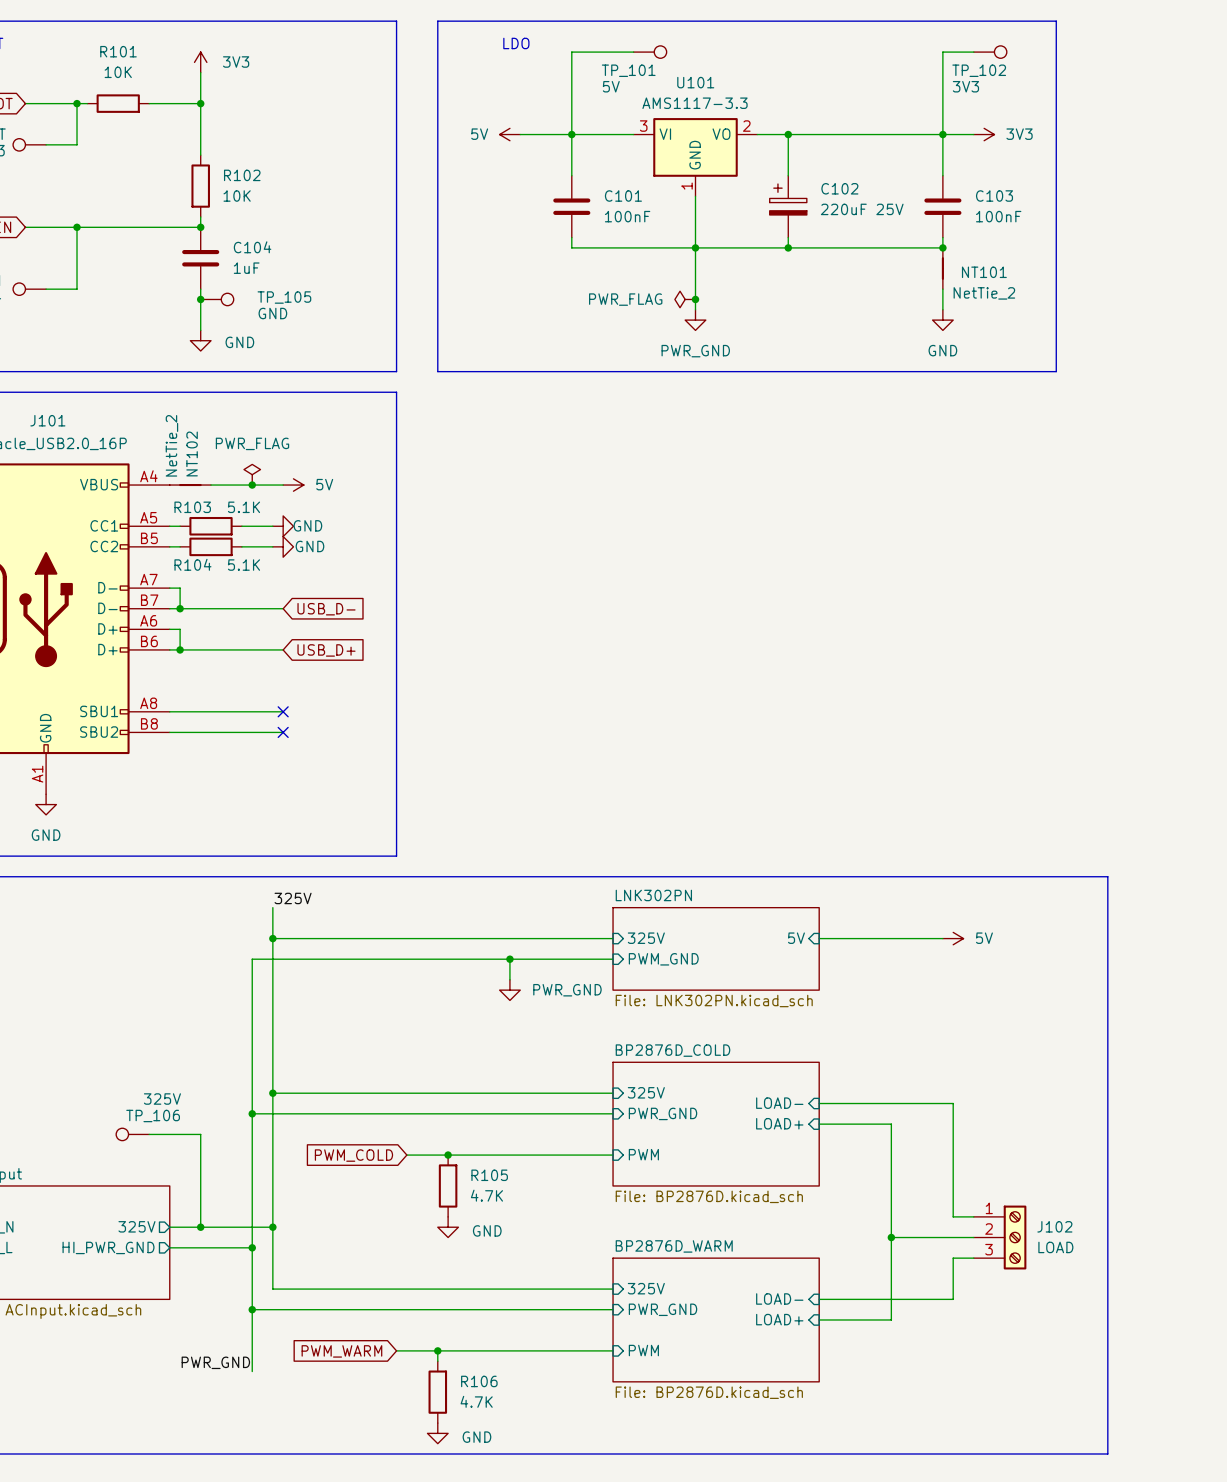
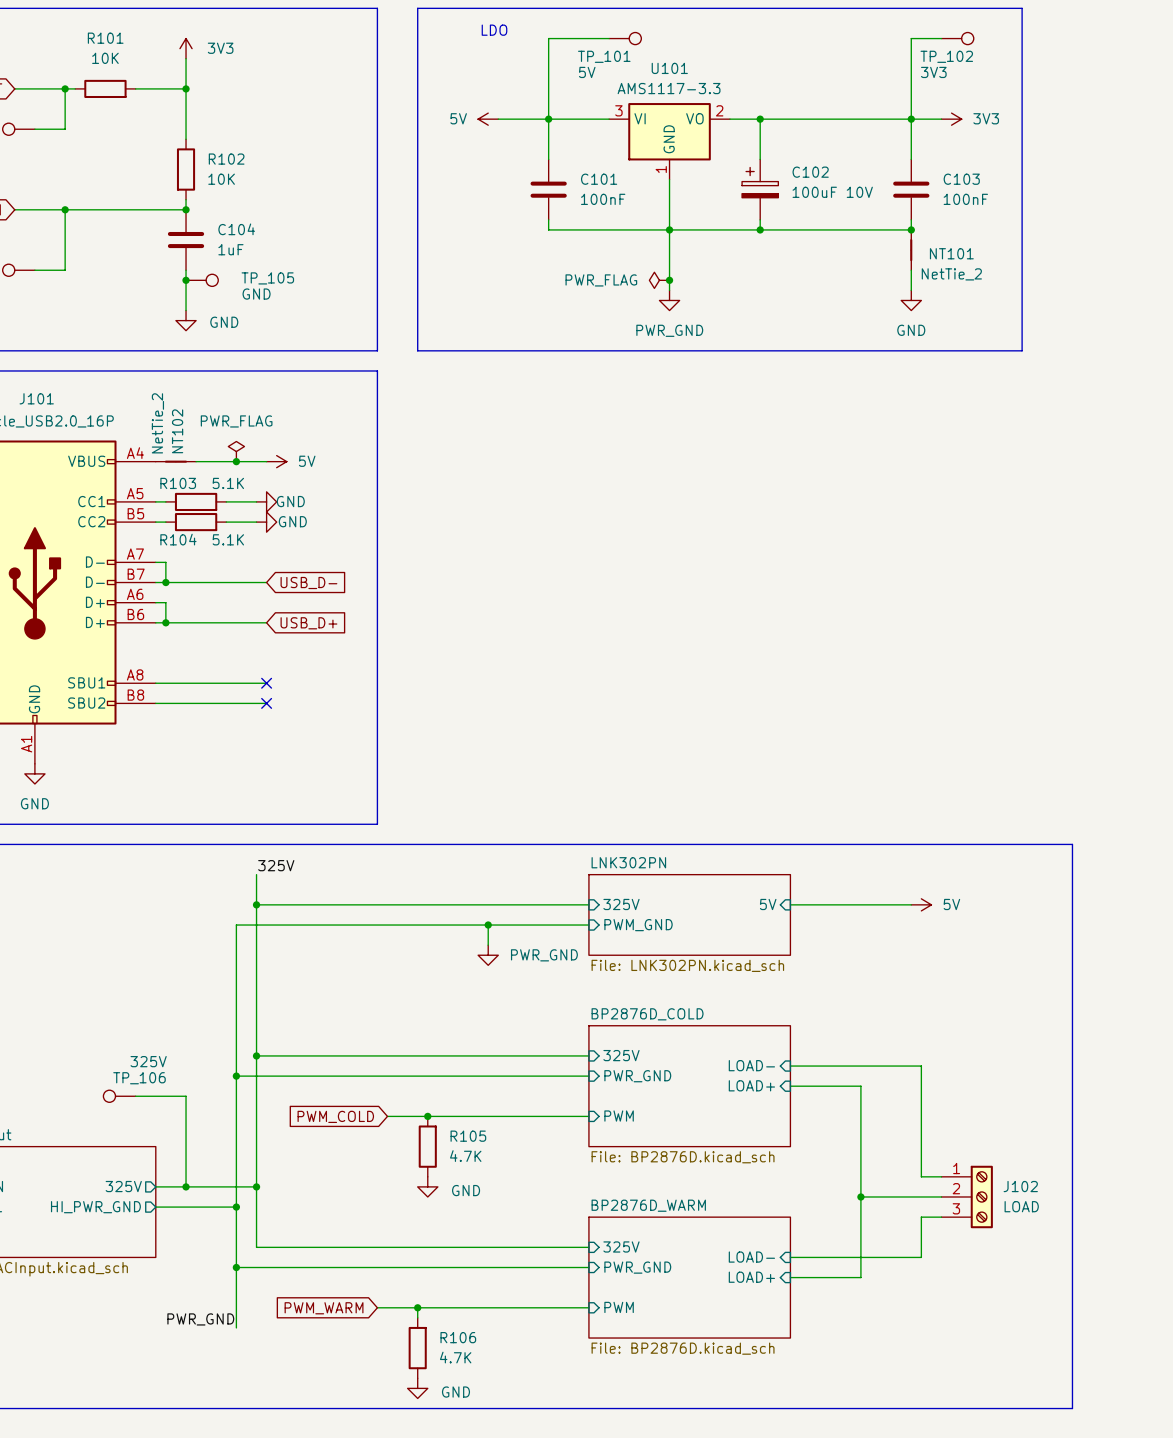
C102 value: 220uF 25V (862, 209) -> 100uF 10V (832, 192)

